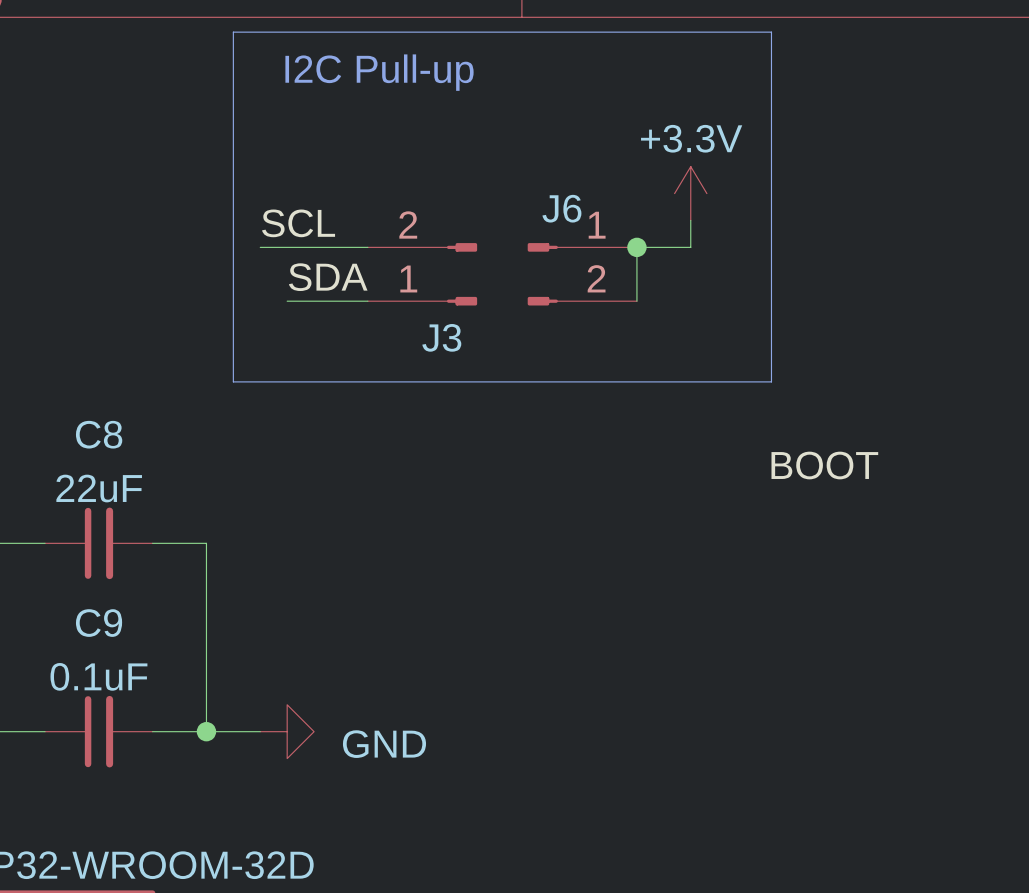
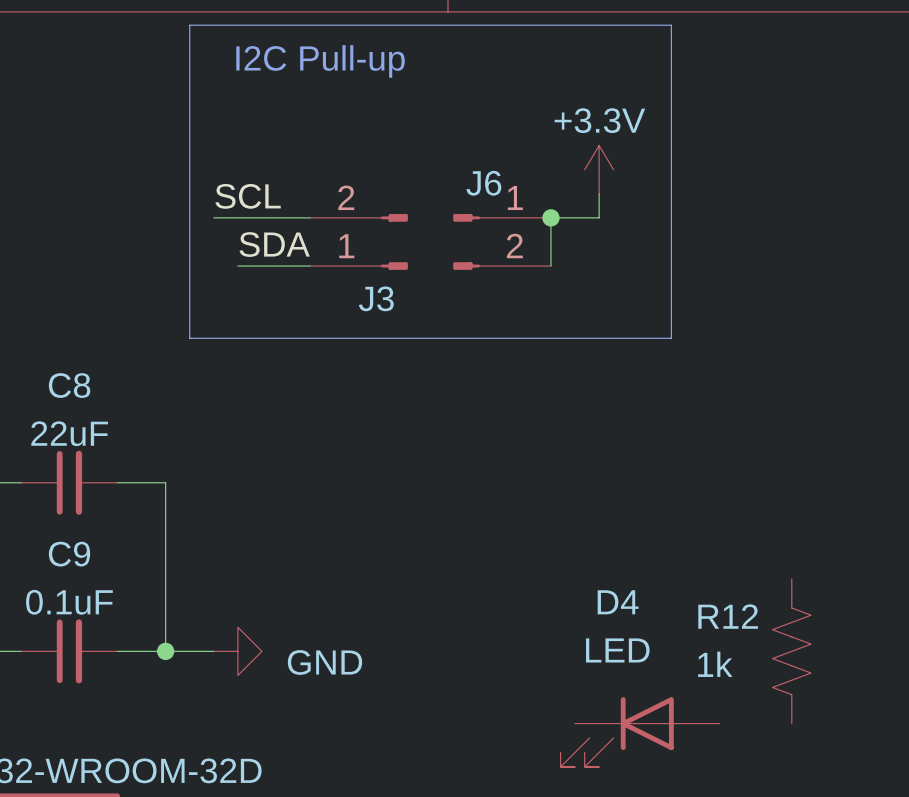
label: BOOT (824, 465) -> none
R12: none -> 1k (791, 651)
D4: none -> LED (640, 732)

